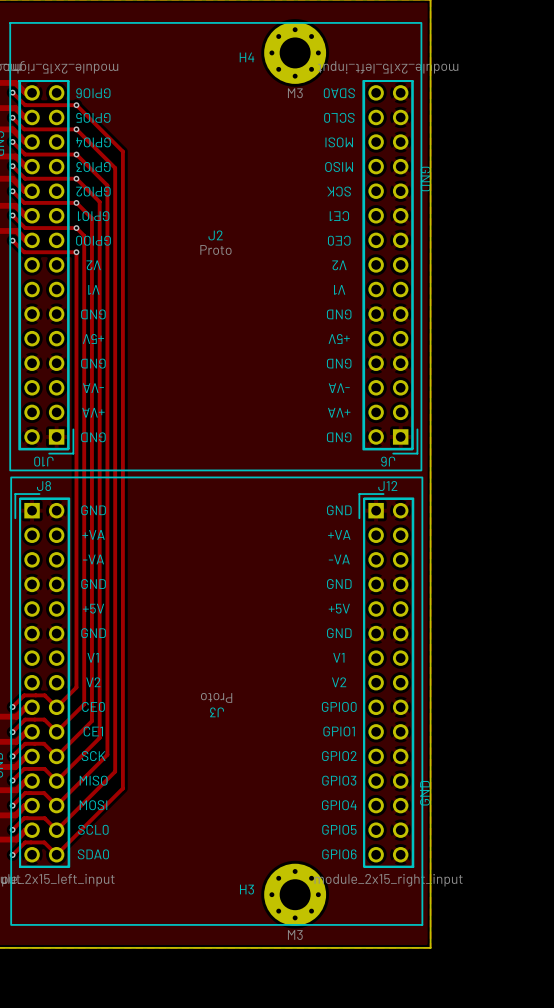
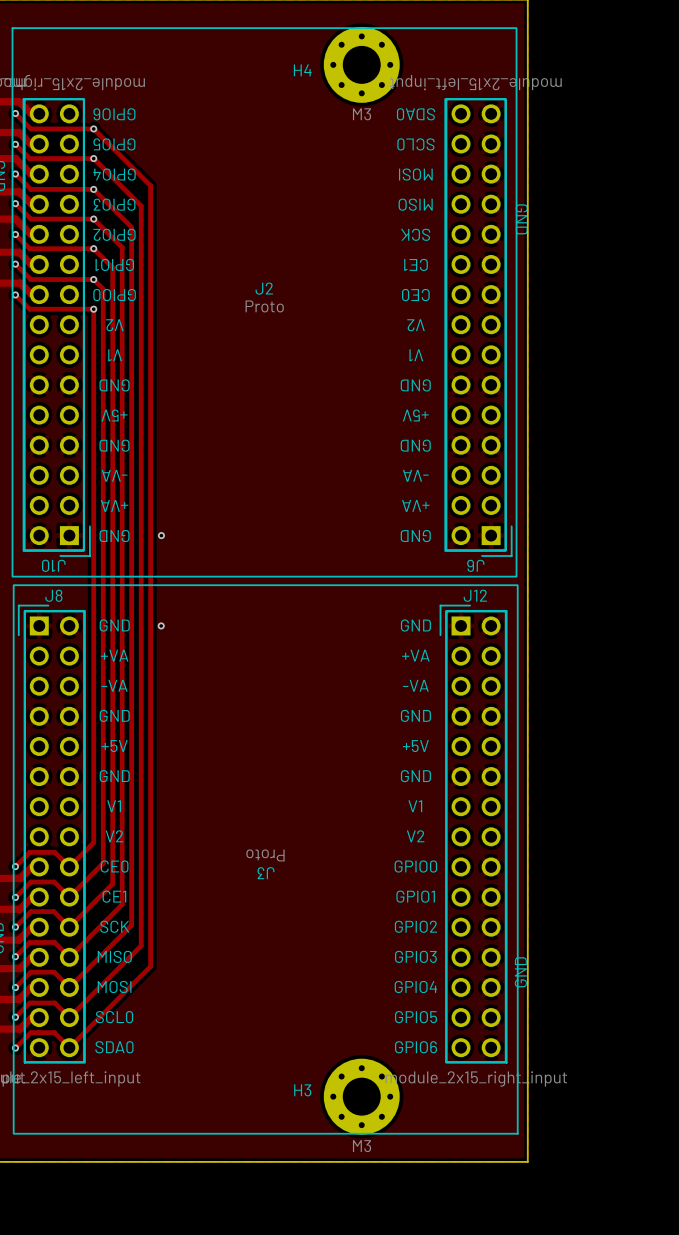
via: none -> (161, 535)
via: none -> (161, 625)

